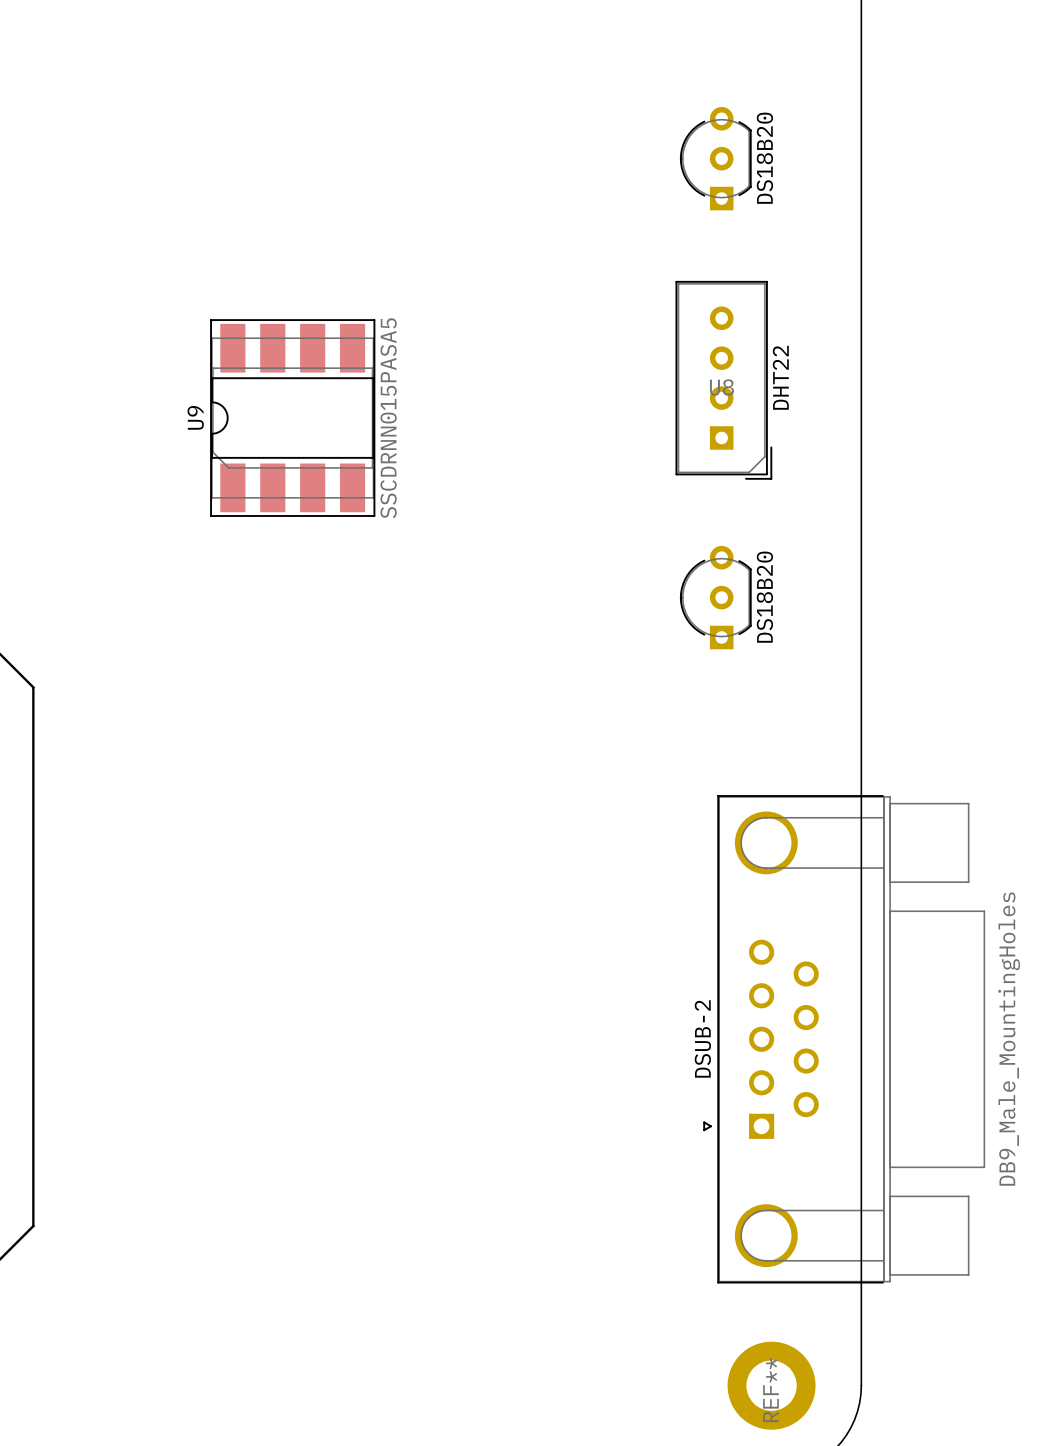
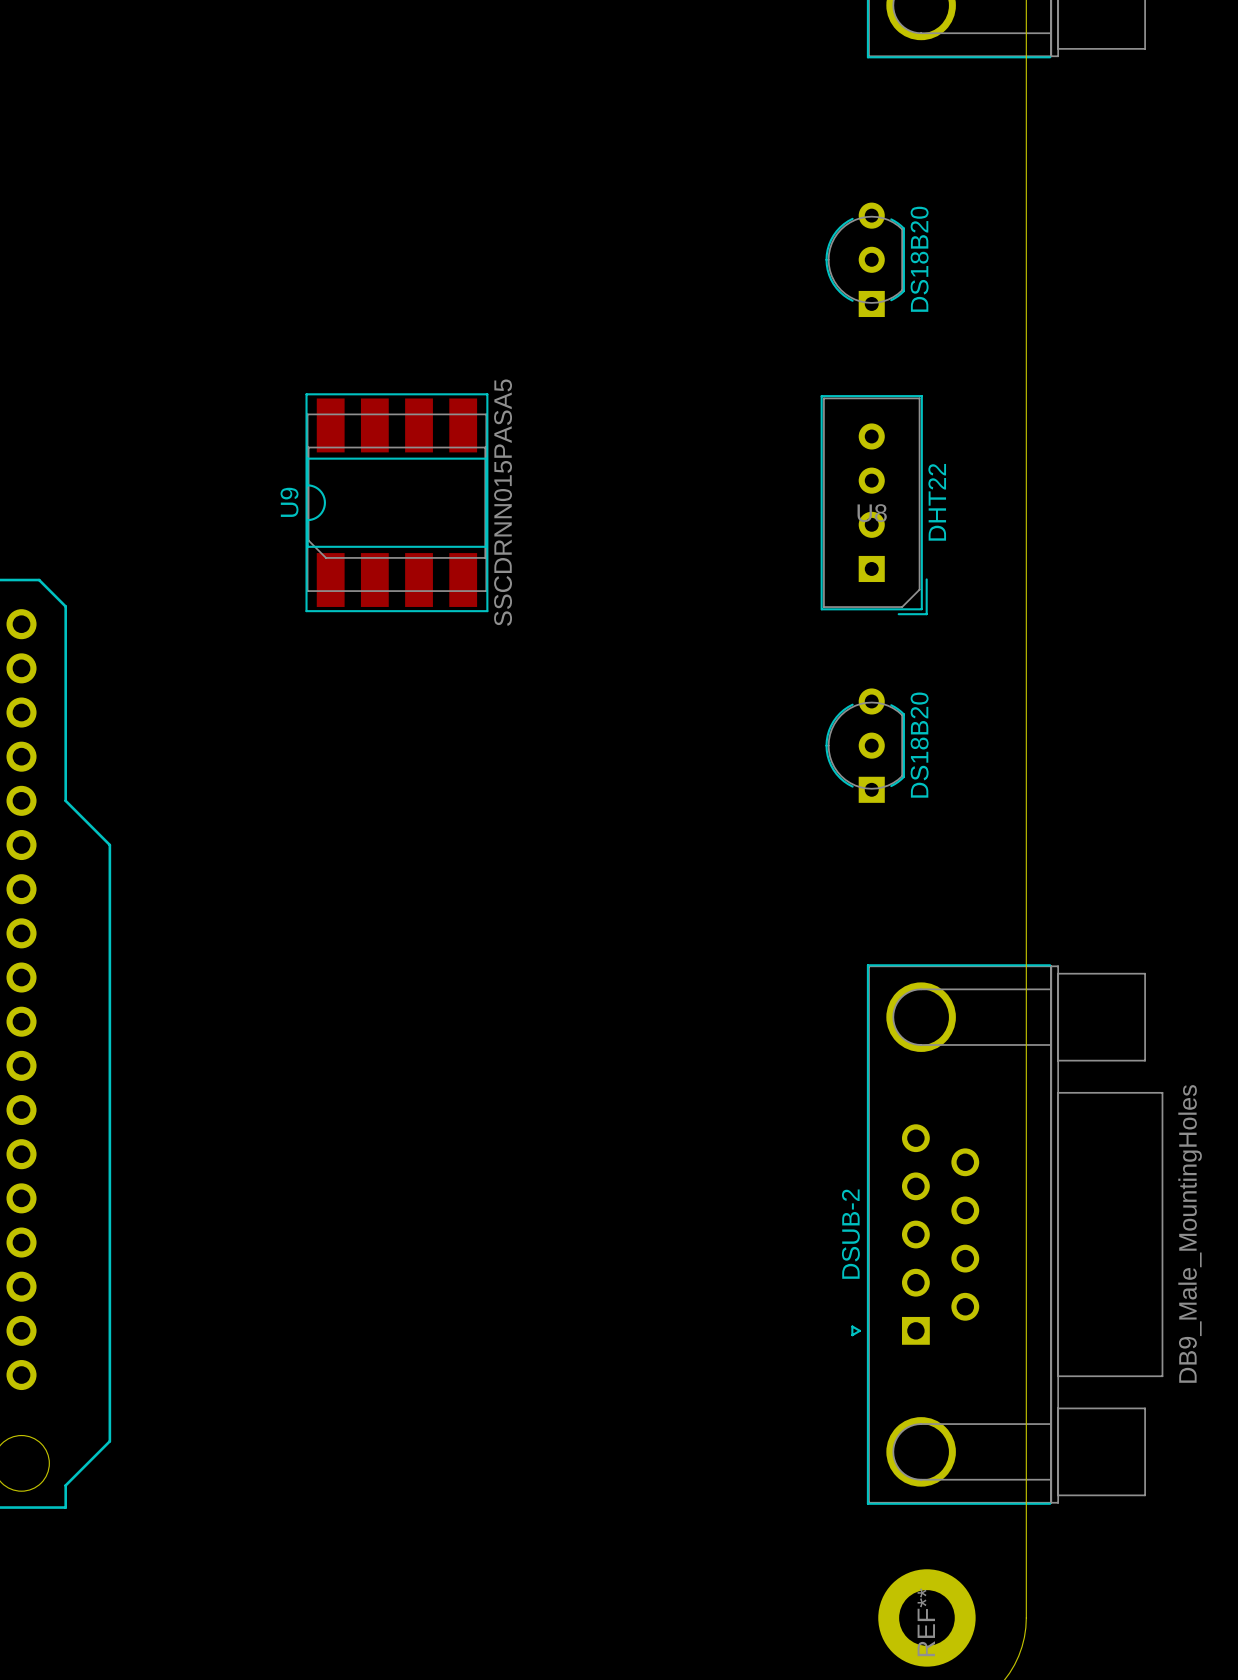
U9 position: (292, 418) -> (396, 502)

